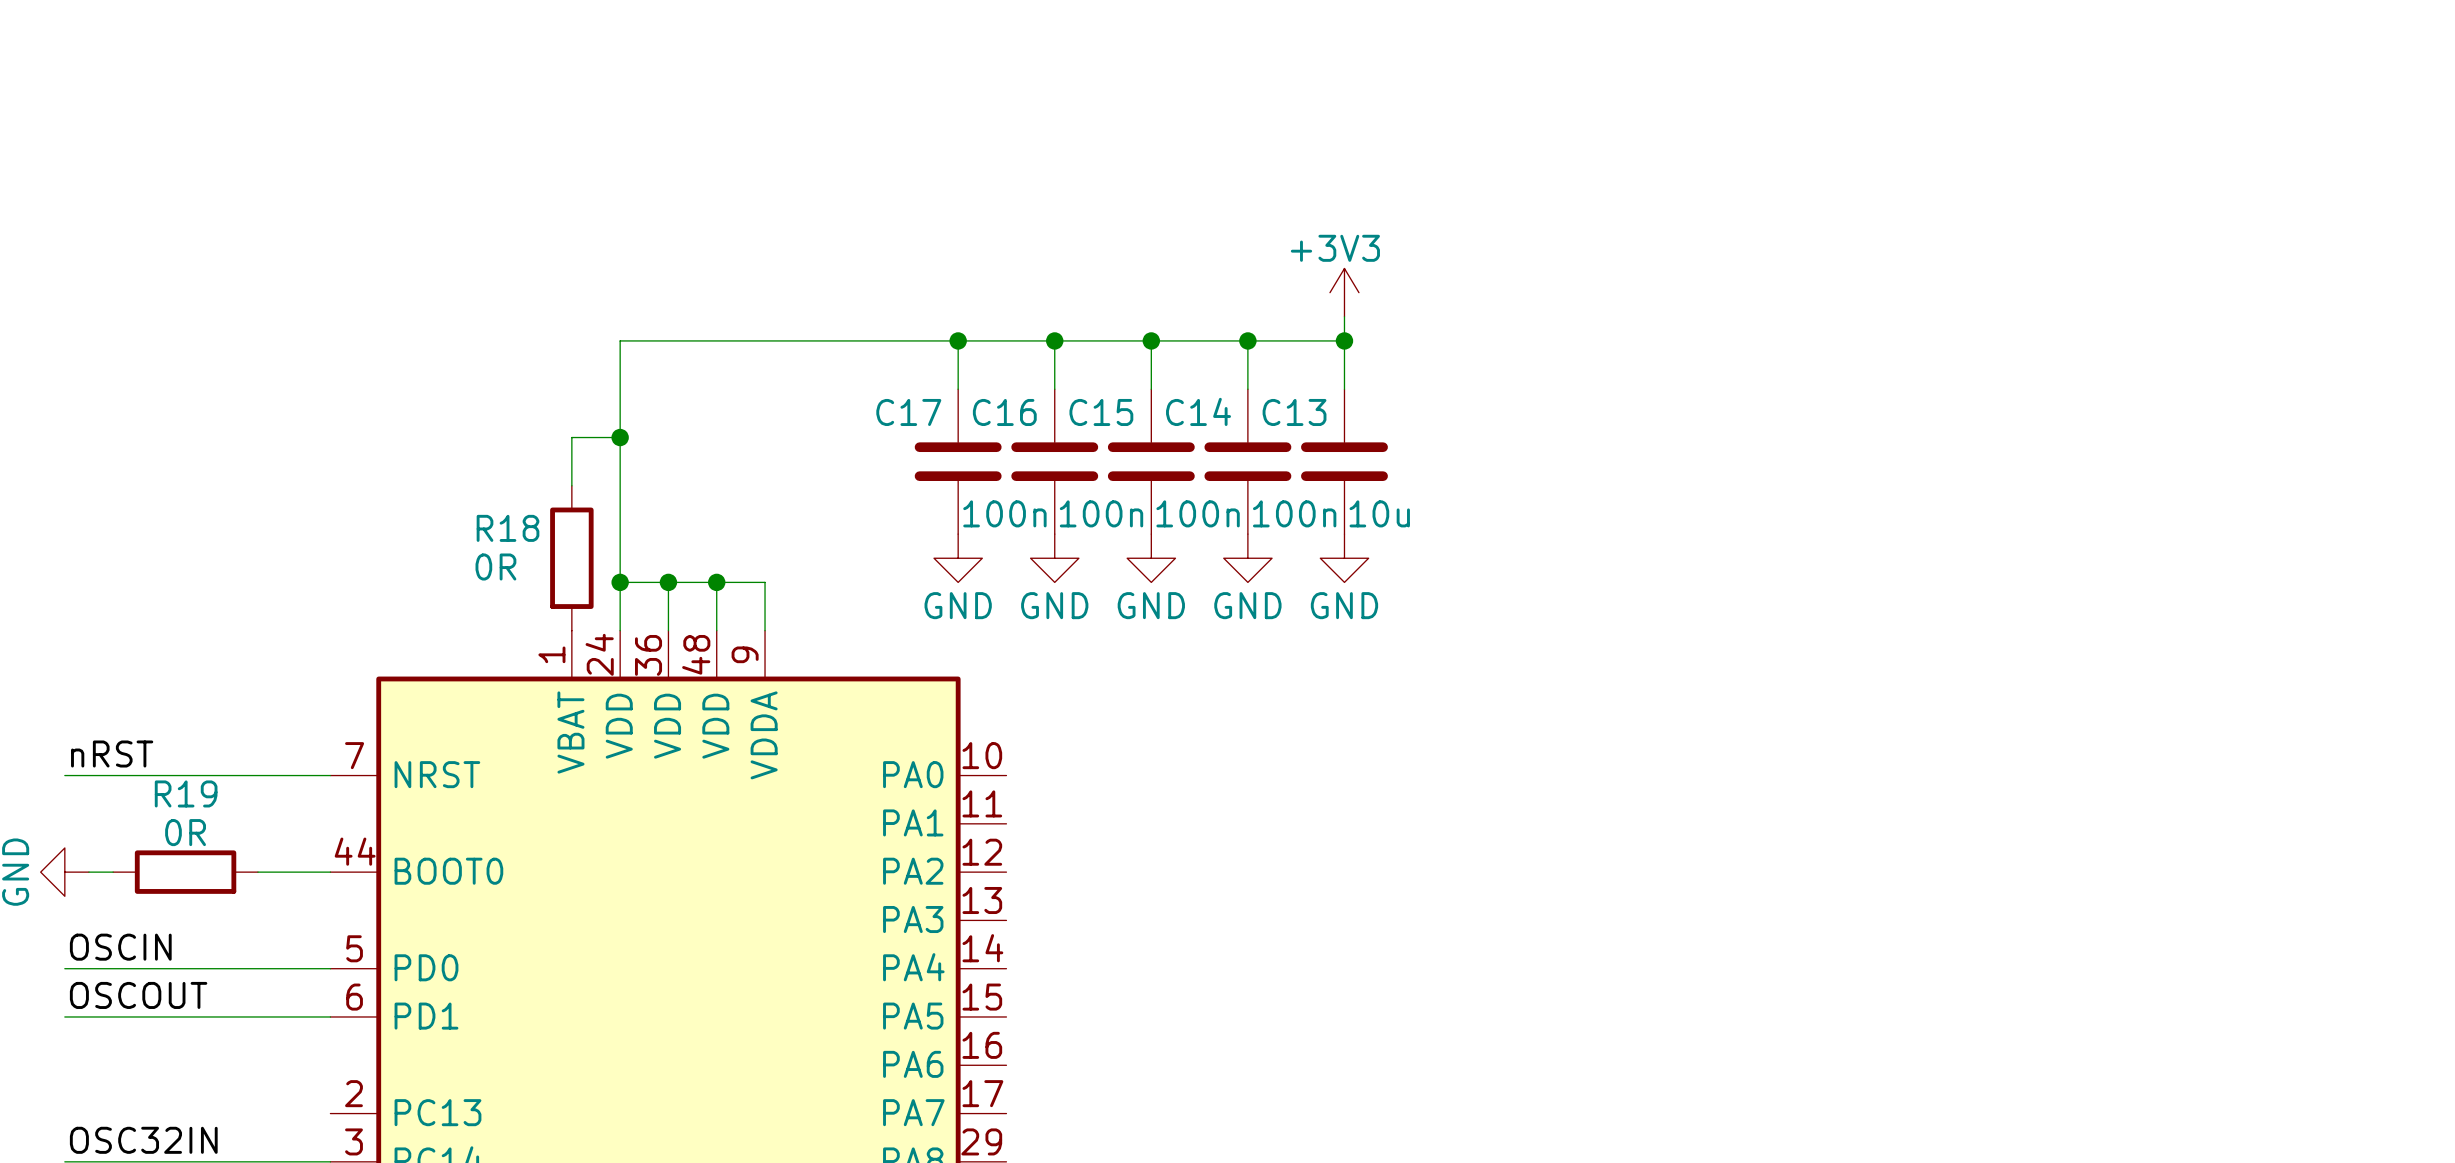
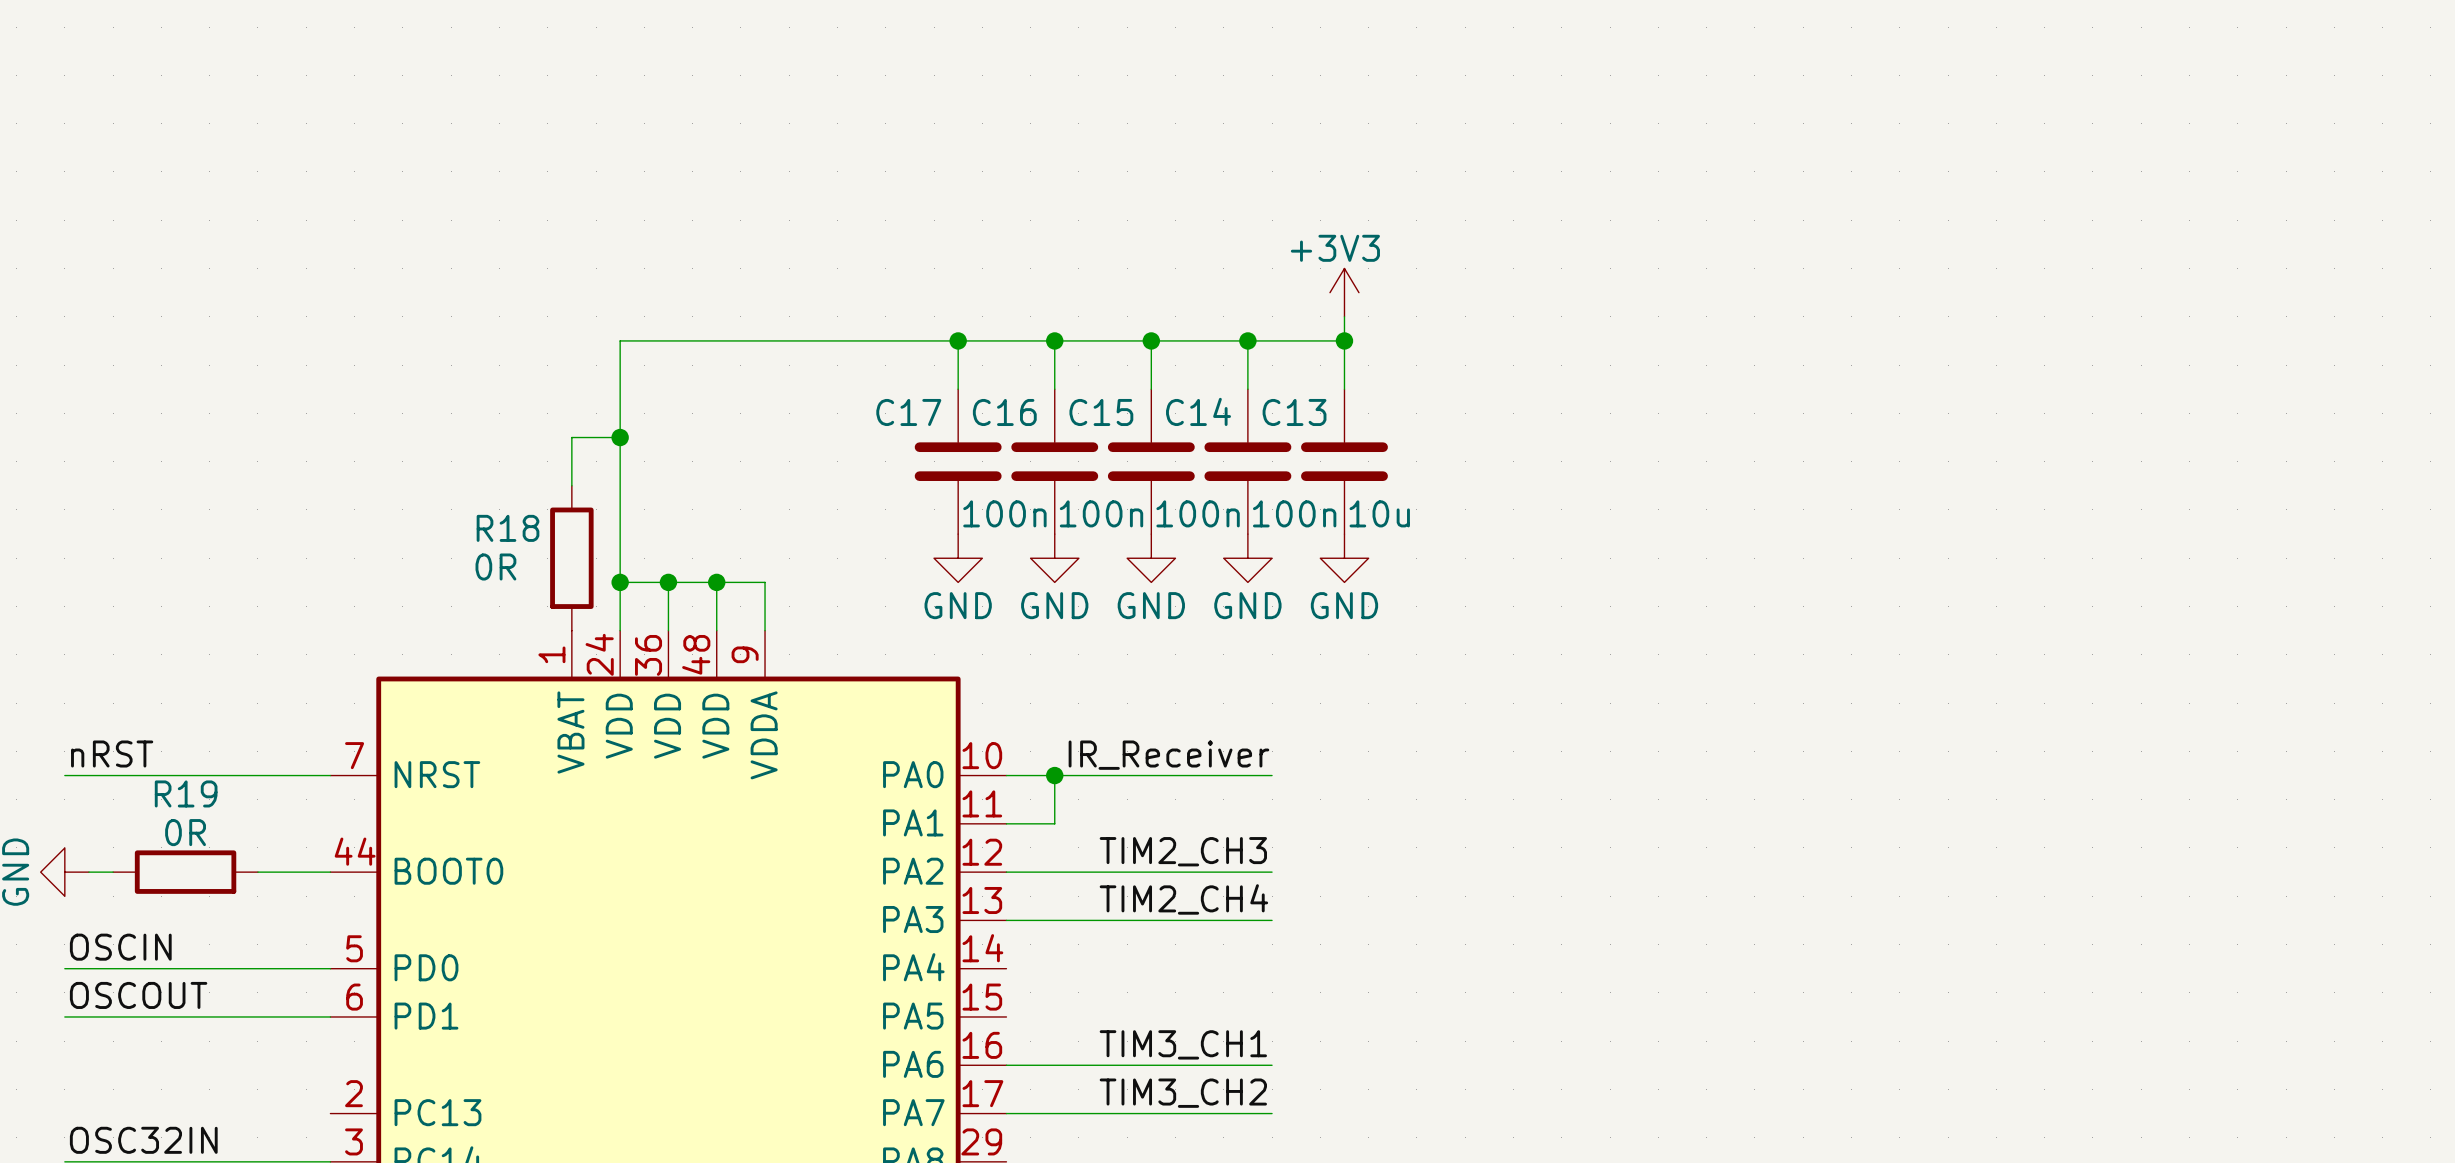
label: none -> IR_Receiver (1168, 755)
wire: none -> (1006, 775) (1272, 775)
wire: none -> (1054, 775) (1054, 823) (1006, 823)
junction: none -> (1054, 775)
label: none -> TIM2_CH3 (1183, 851)
wire: none -> (1006, 872) (1272, 872)
label: none -> TIM2_CH4 (1183, 899)
wire: none -> (1006, 920) (1272, 920)
label: none -> TIM3_CH1 (1183, 1044)
wire: none -> (1006, 1065) (1272, 1065)
label: none -> TIM3_CH2 (1183, 1093)
wire: none -> (1006, 1113) (1272, 1113)

